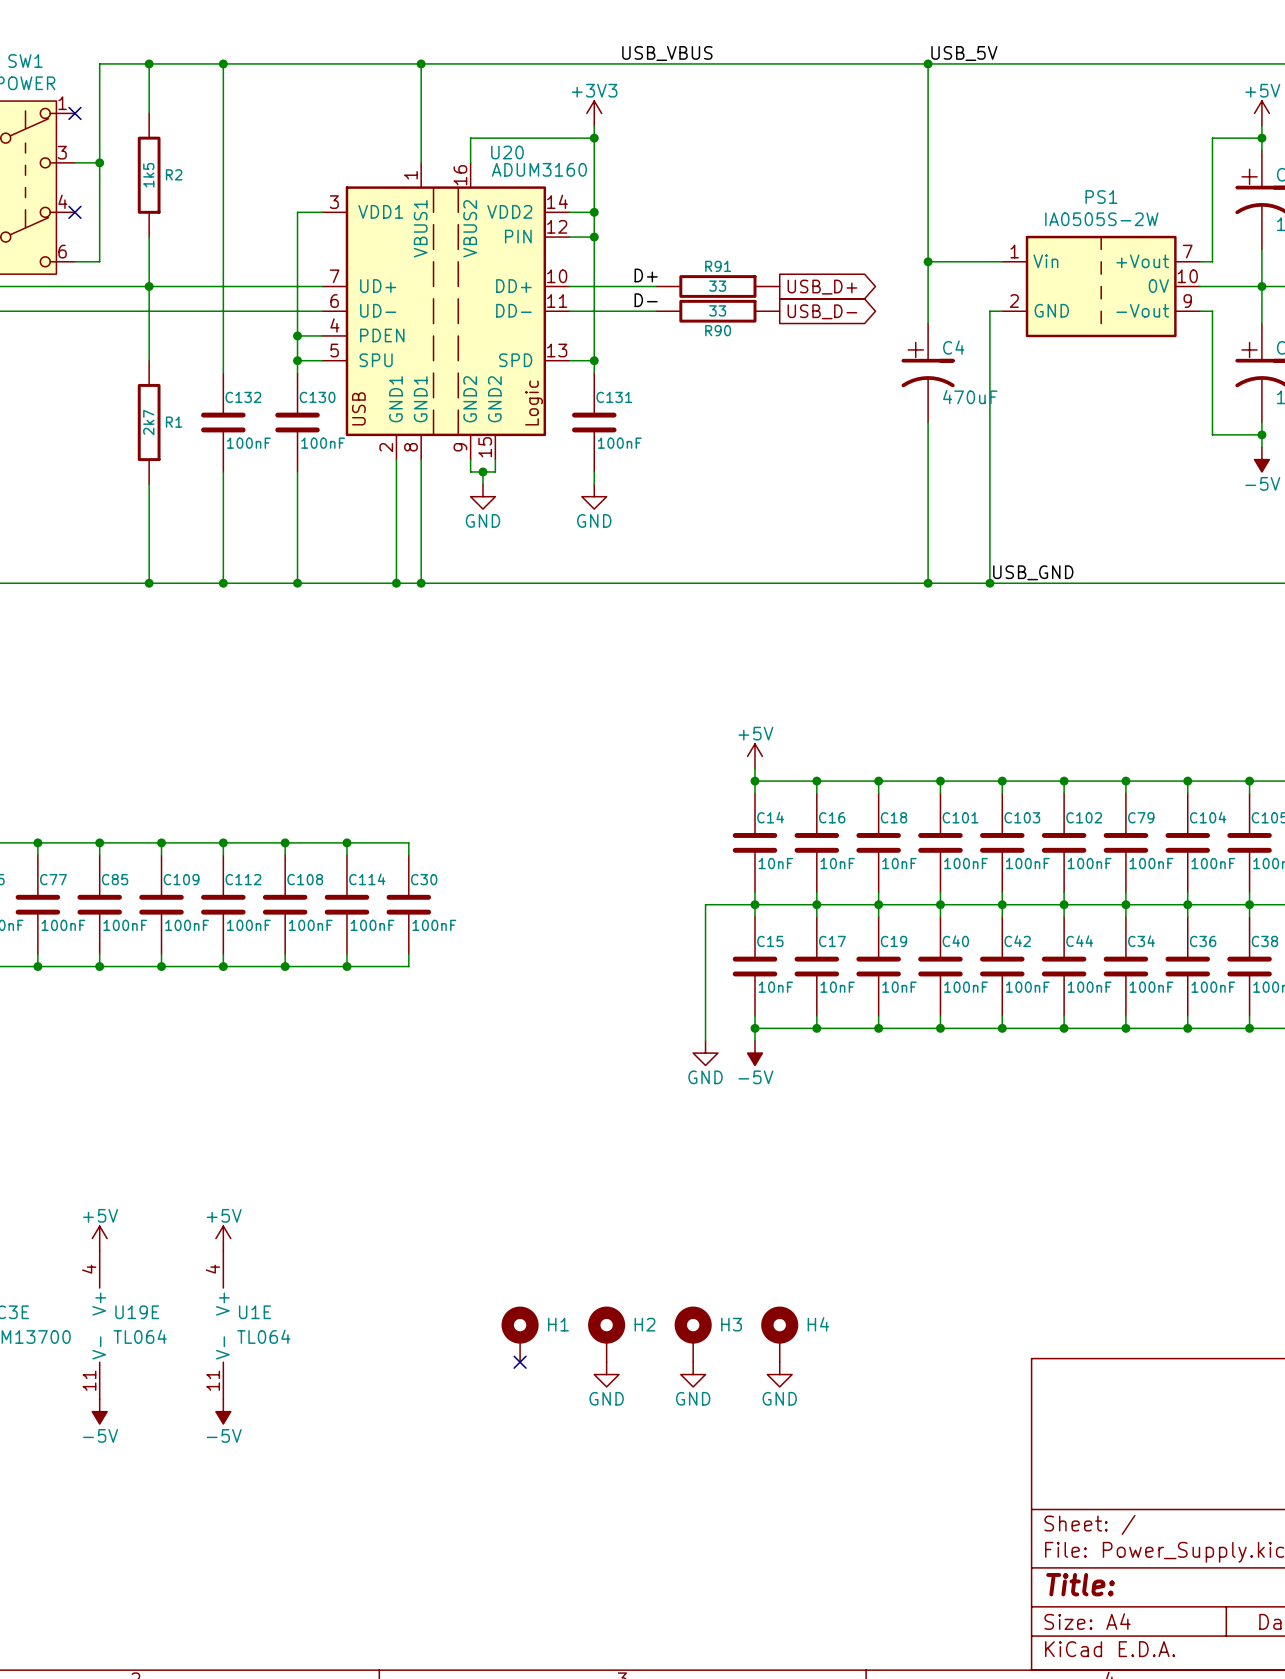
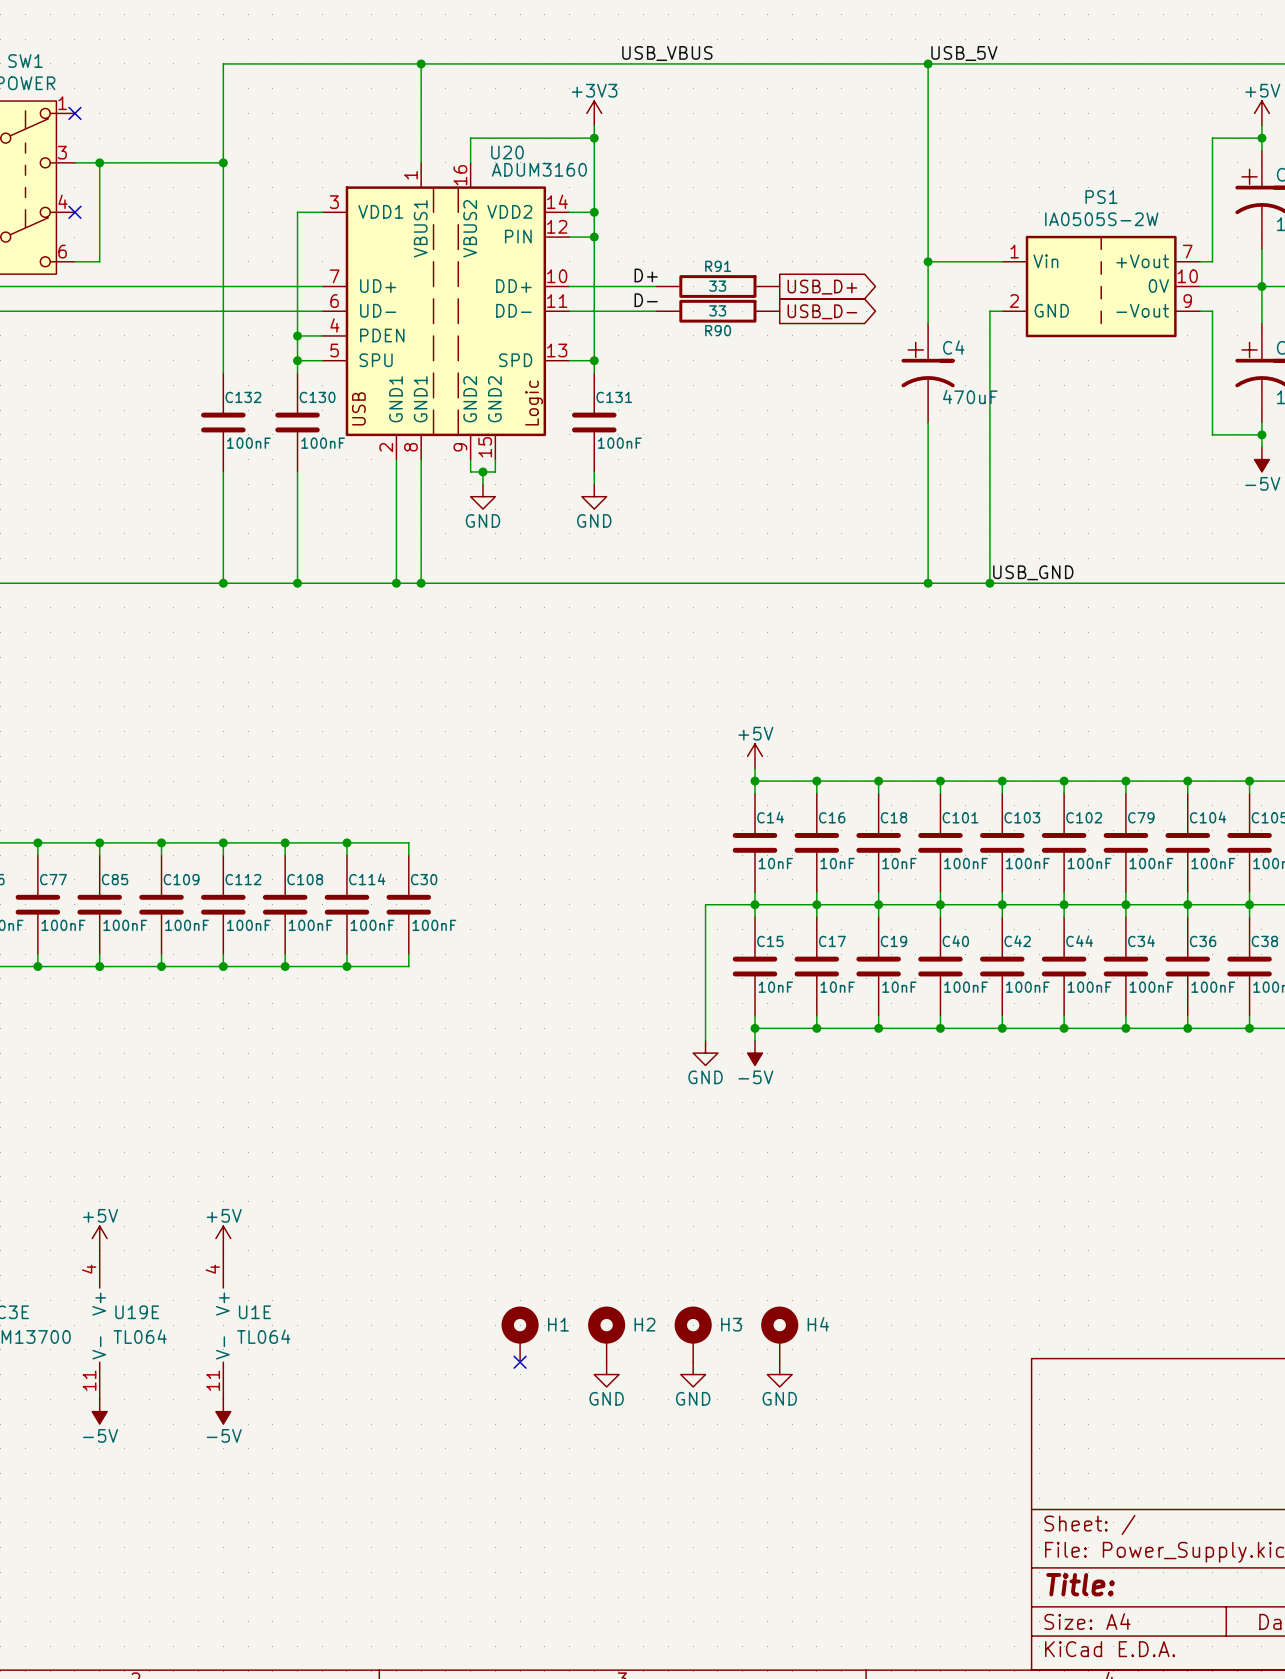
wire: (149, 63) (149, 113) -> none
junction: (149, 63) -> none
wire: (223, 63) (99, 63) (99, 162) -> (223, 162) (99, 162)
junction: (223, 63) -> none
junction: none -> (223, 162)
R2: 1k5 (149, 175) -> none
wire: (149, 237) (149, 360) -> none
junction: (149, 286) -> none
R1: 2k7 (149, 422) -> none
wire: (149, 484) (149, 583) -> none
junction: (149, 583) -> none

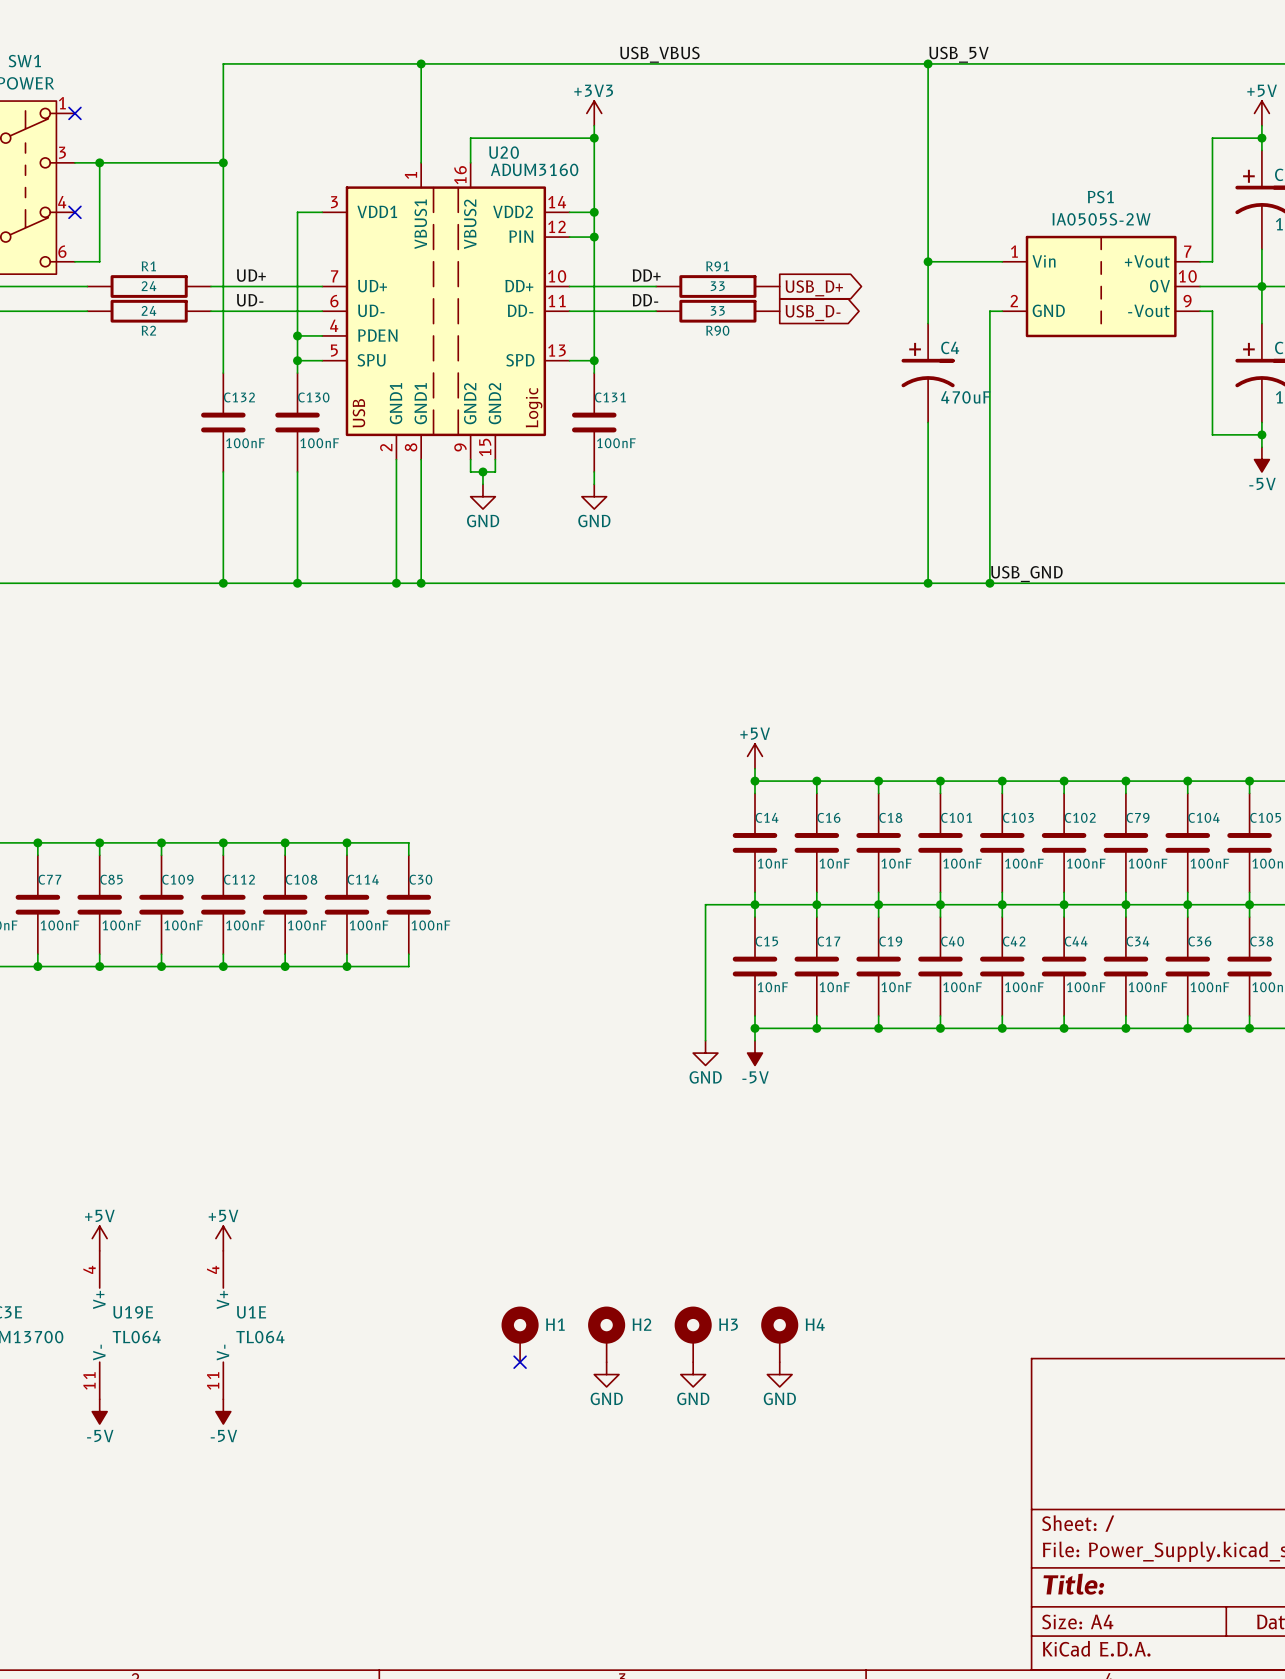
label: none -> UD+ (251, 275)
label: D+ (646, 275) -> DD+ (646, 275)
wire: (87, 286) (210, 286) -> none
R1: none -> 24 (149, 286)
label: none -> UD- (250, 300)
label: D- (646, 300) -> DD- (645, 300)
wire: (87, 311) (210, 311) -> none
R2: none -> 24 (149, 311)

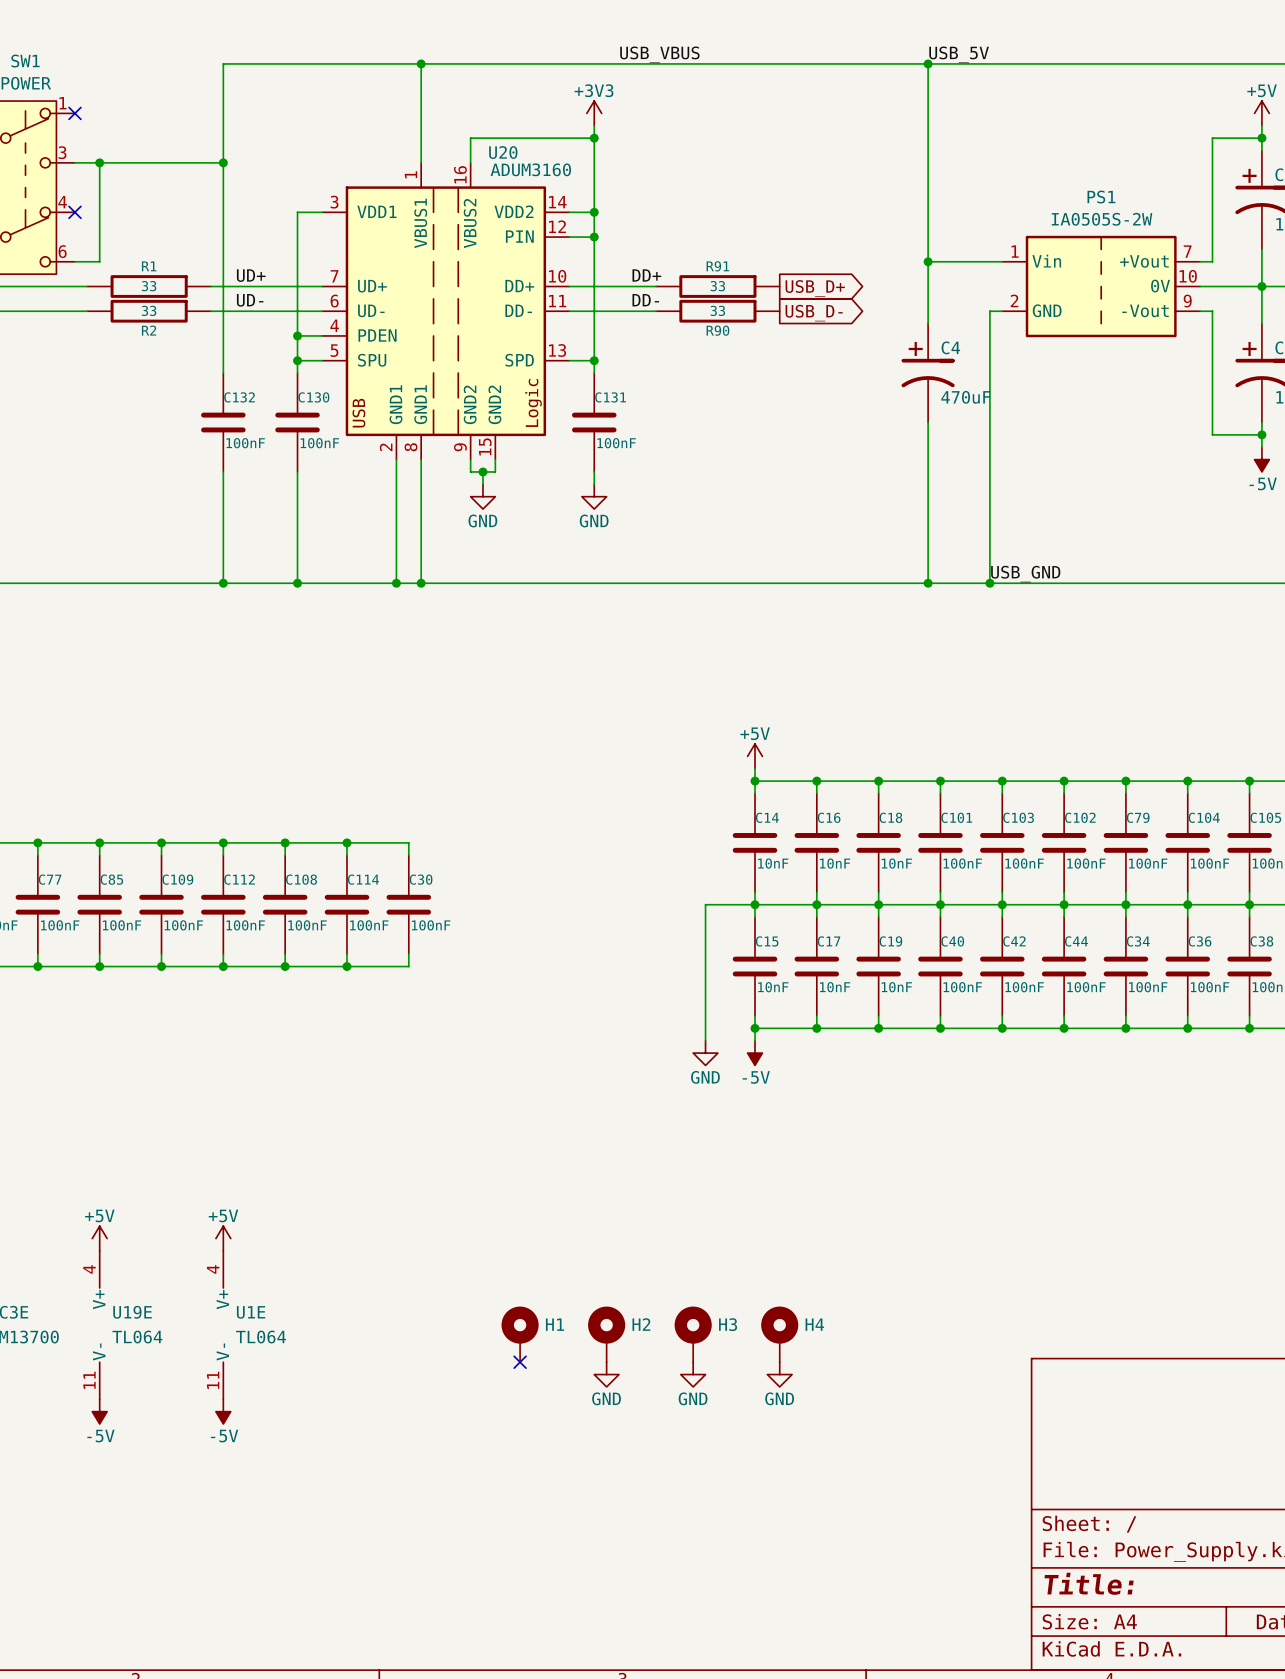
R1 value: 24 (148, 286) -> 33 (149, 286)
R2 value: 24 (148, 310) -> 33 (149, 310)

